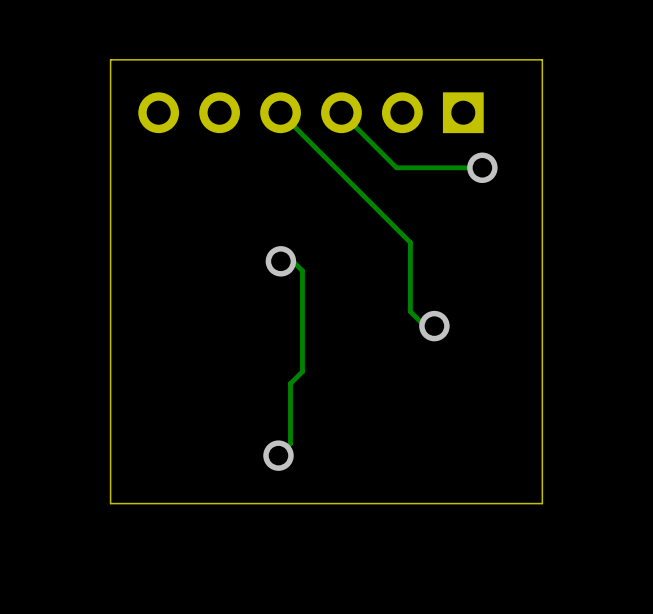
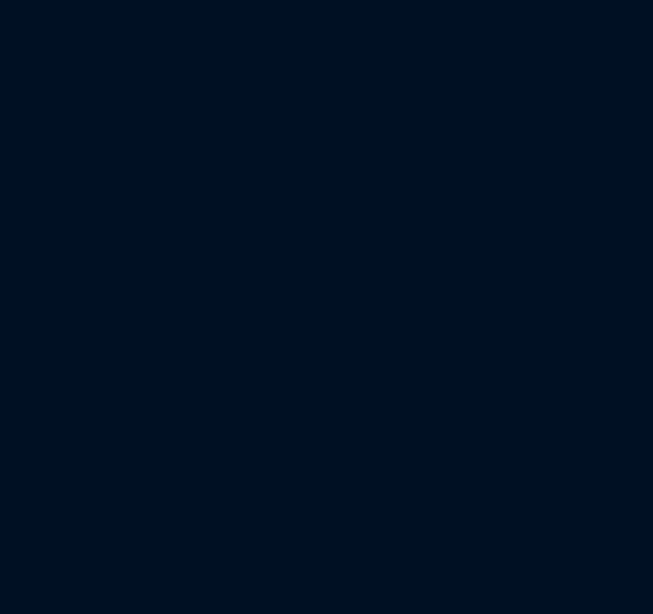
board edge: (542, 59) (110, 59) (110, 503) (542, 503) (542, 59) -> none
track: (280, 112) (410, 242) (410, 311) (424, 326) (434, 326) -> none
part: (310, 112) -> none
track: (341, 112) (396, 167) (482, 167) -> none
via: (482, 167) -> none
track: (280, 261) (292, 261) (302, 270) (302, 371) (290, 383) (290, 443) (278, 455) -> none
via: (280, 261) -> none
via: (434, 326) -> none
via: (278, 455) -> none

